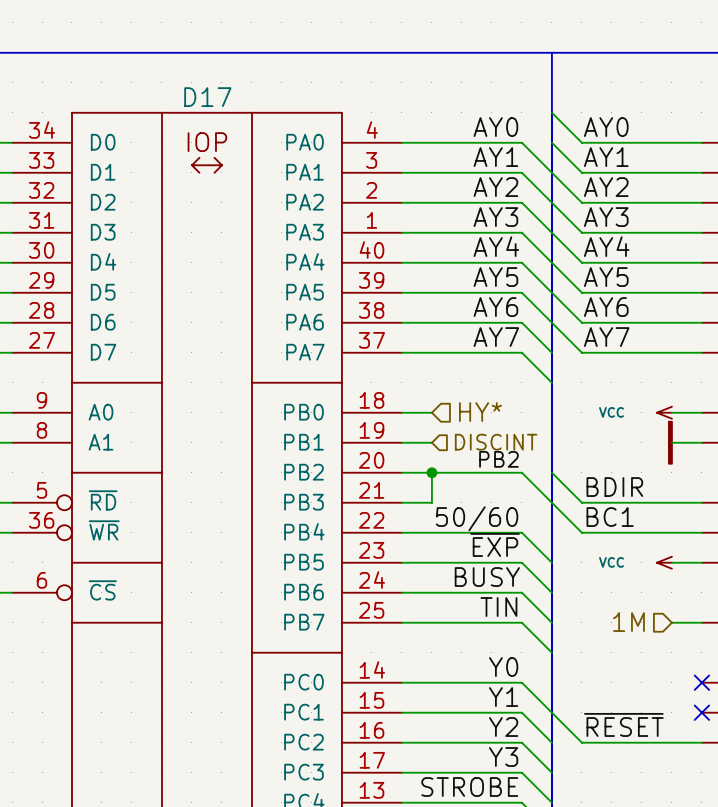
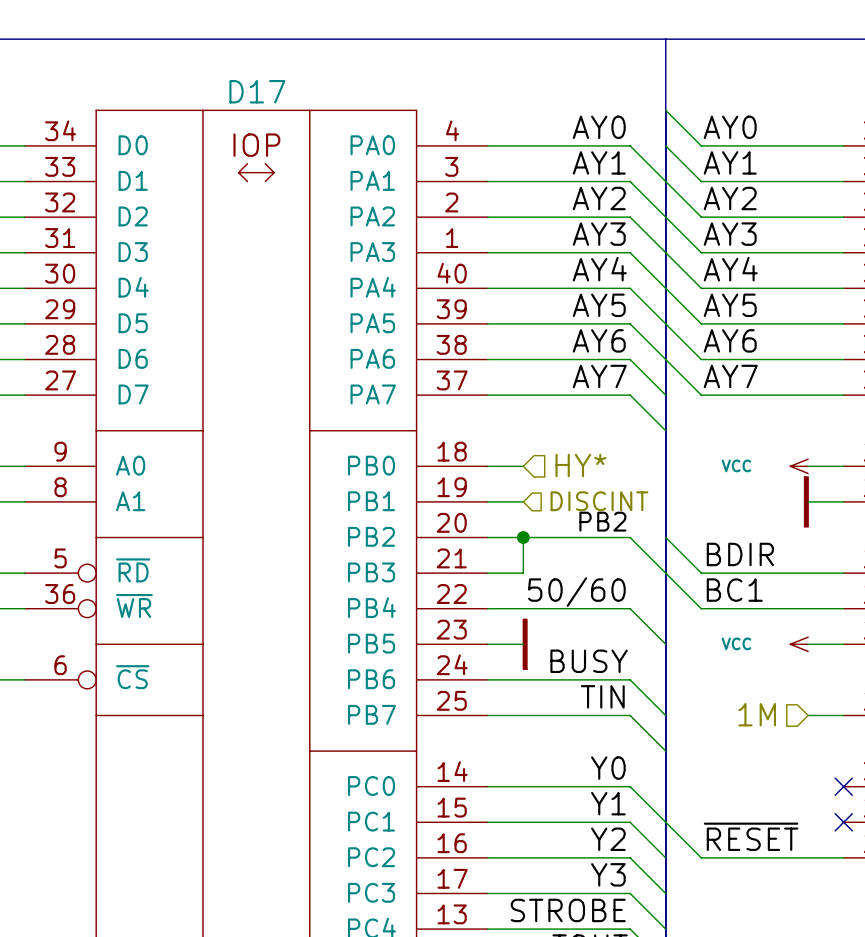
label: ~{EXP} (495, 544) -> none
wire: (431, 562) (521, 562) (551, 592) -> none
power symbol: none -> (525, 644)

